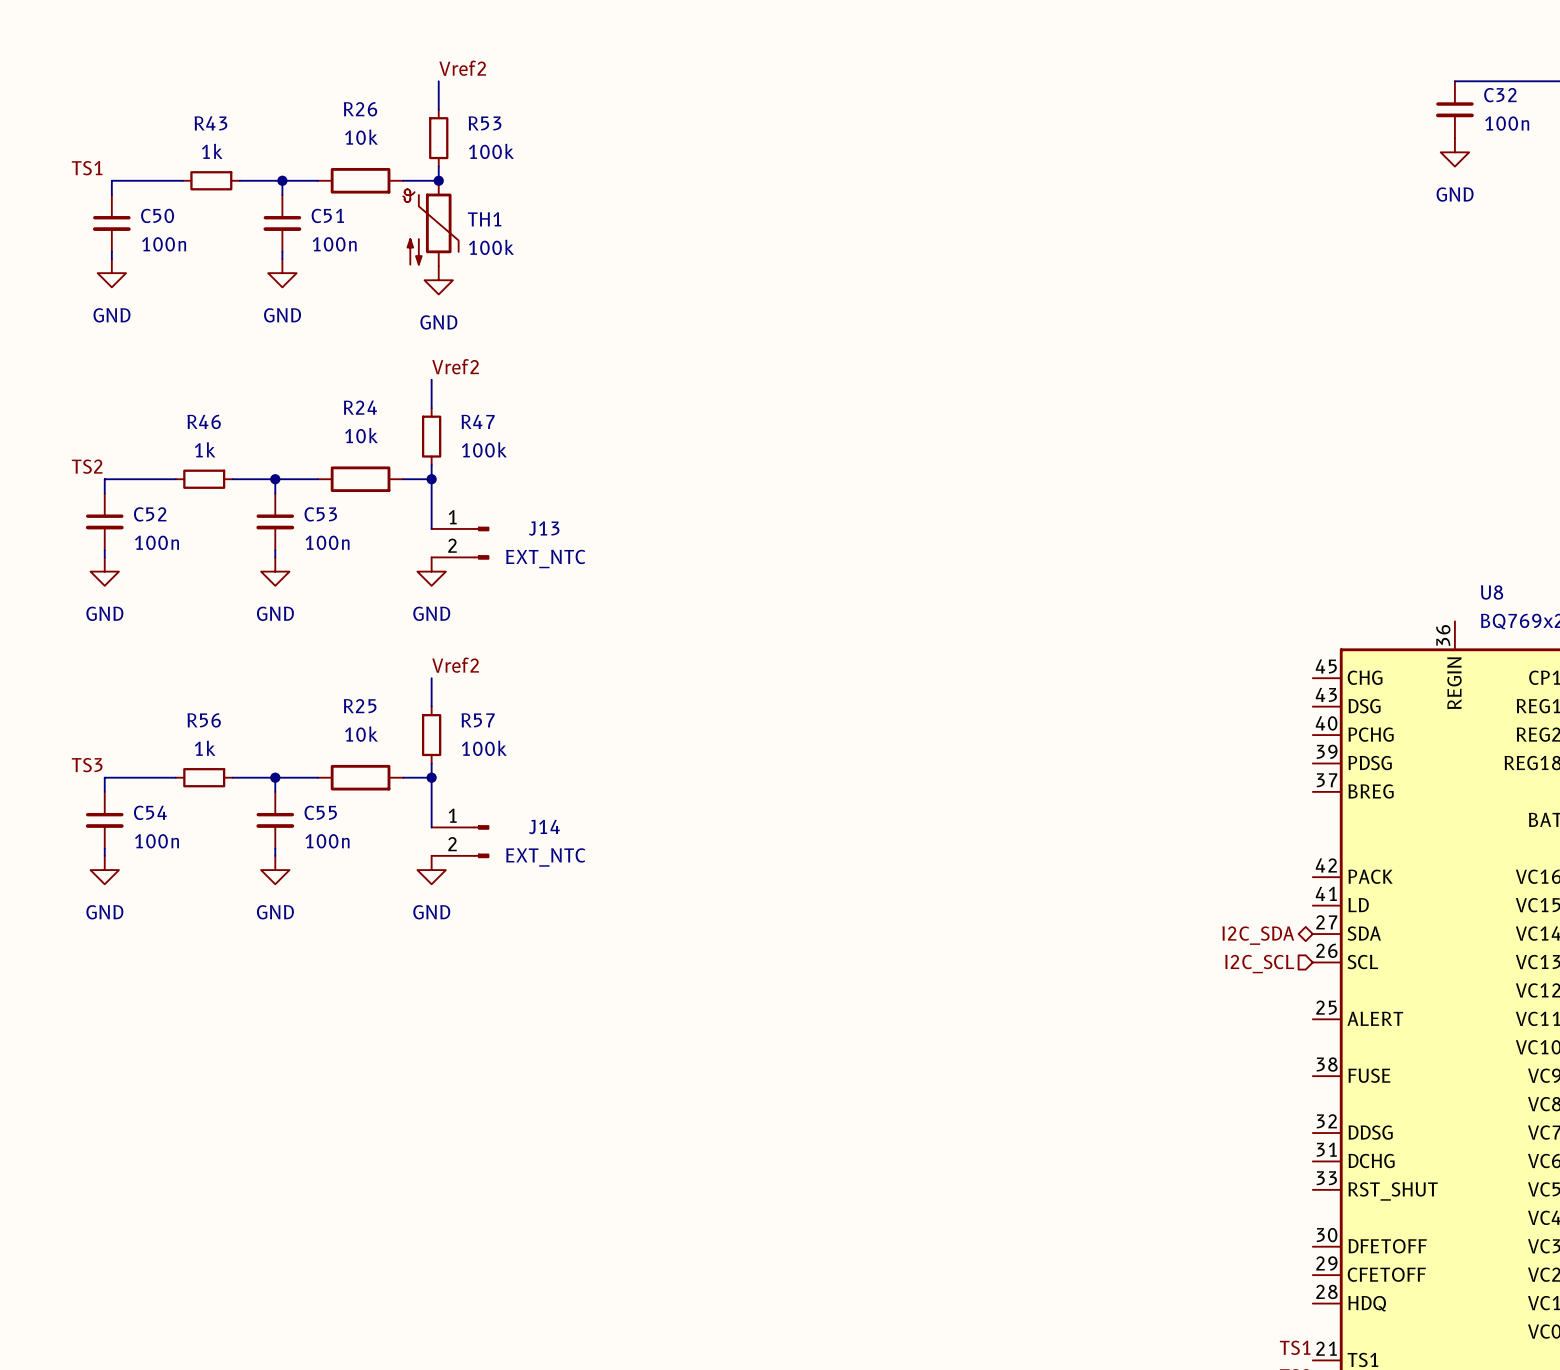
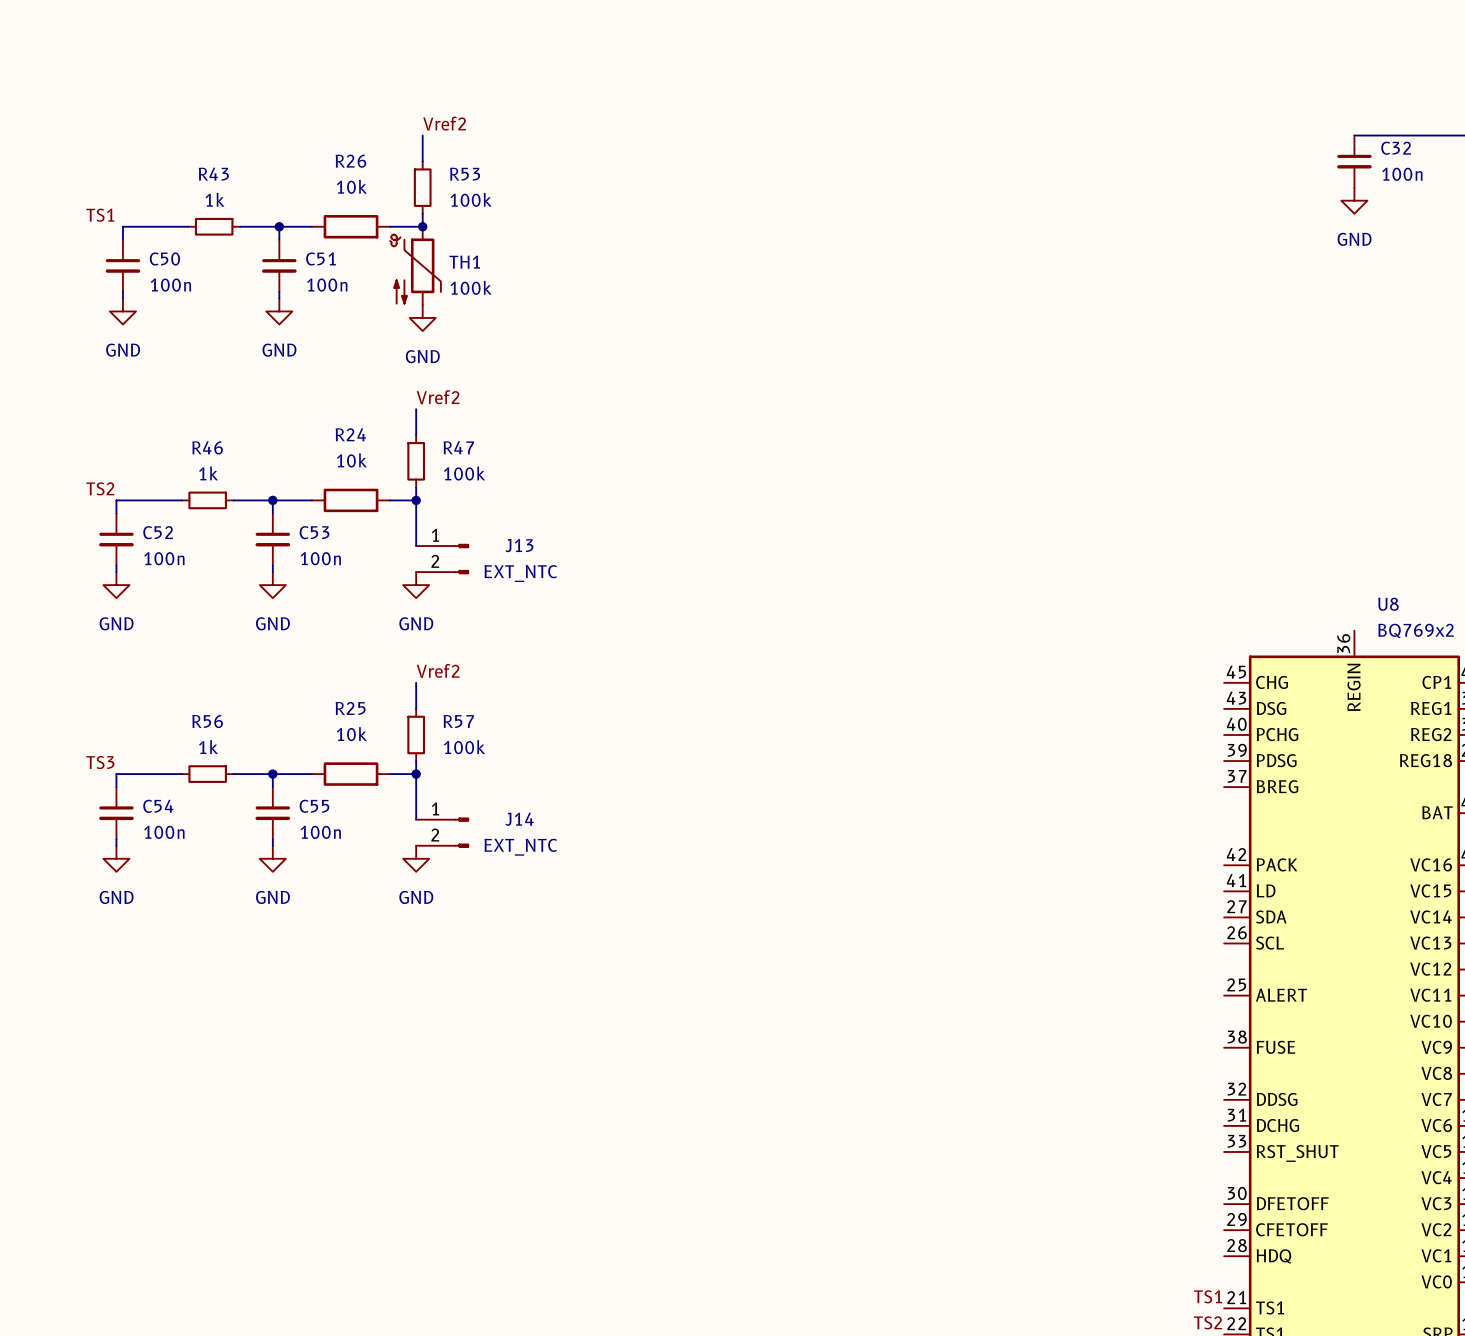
hierarchical label: I2C_SDA (1258, 935) -> none
hierarchical label: I2C_SCL (1259, 964) -> none

